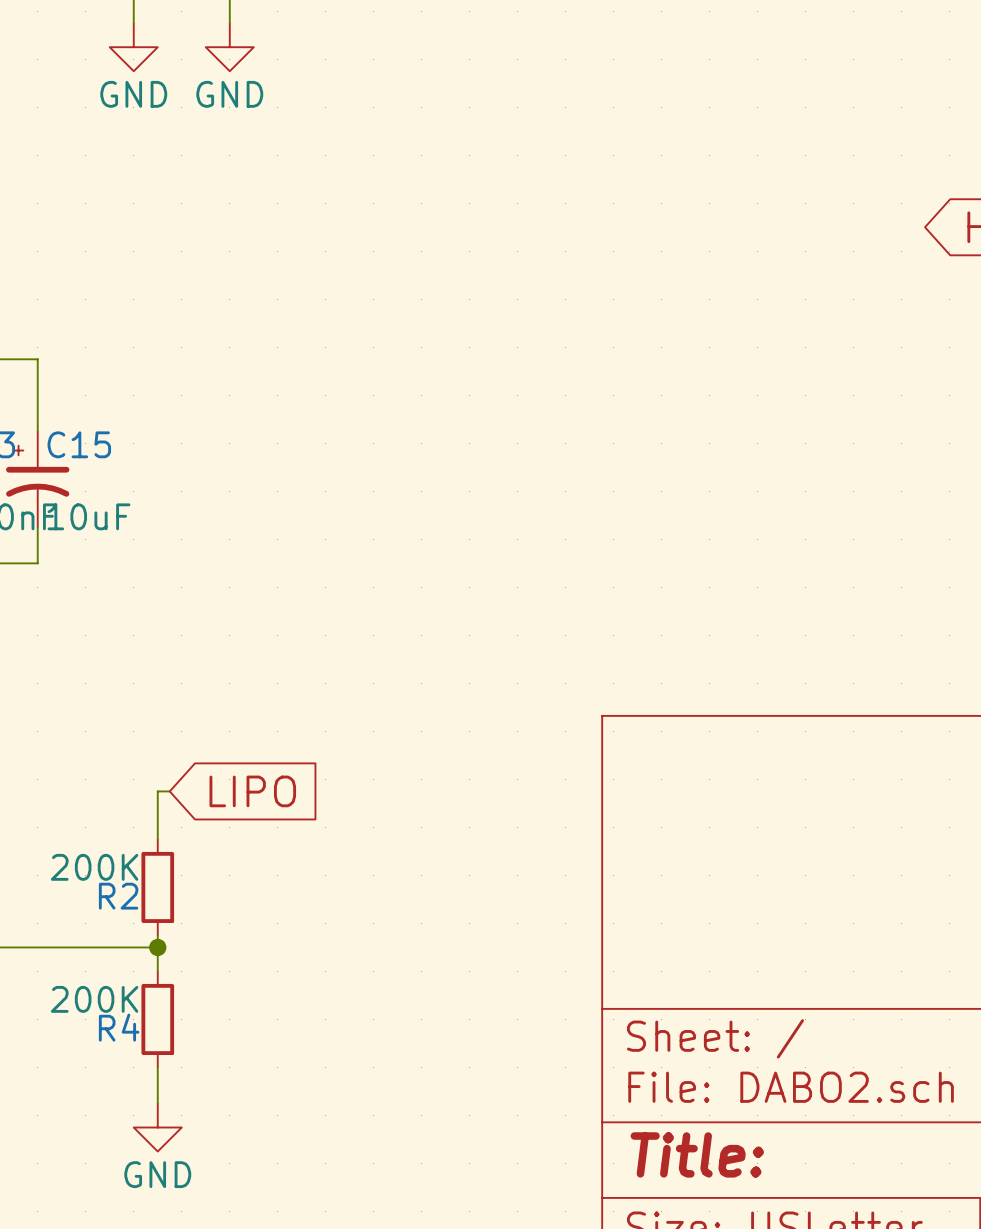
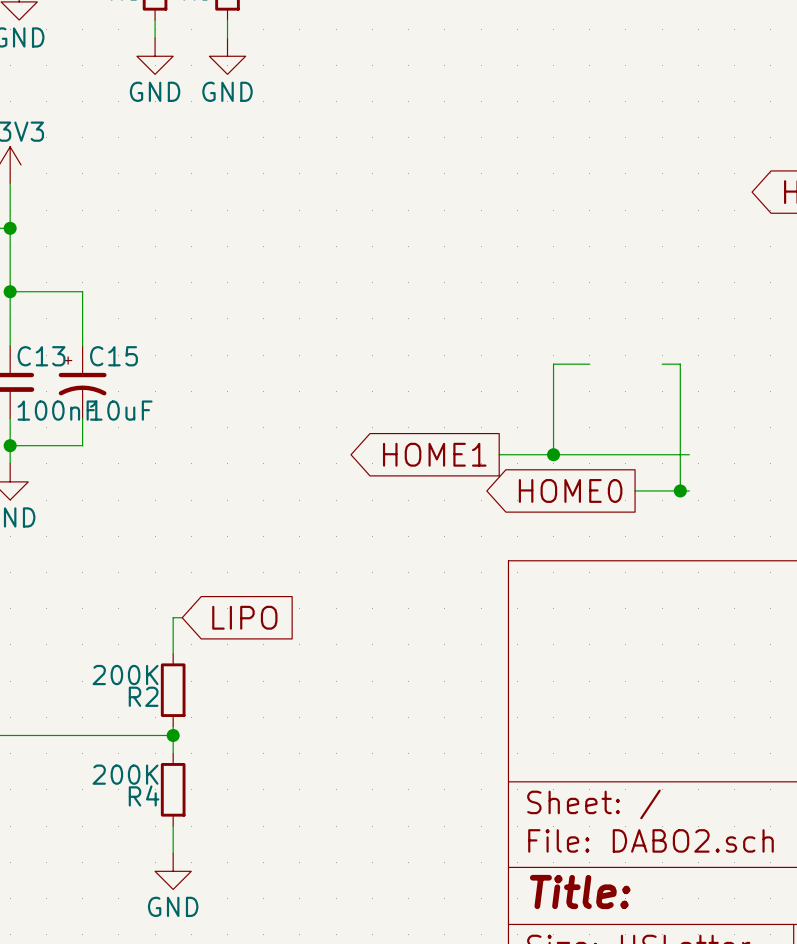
wire: none -> (589, 364) (553, 364) (553, 454)
wire: none -> (662, 364) (680, 364) (680, 490)
global label: none -> HOME1 (434, 454)
wire: none -> (499, 454) (689, 454)
junction: none -> (553, 454)
global label: none -> HOME0 (570, 490)
wire: none -> (635, 490) (689, 490)
junction: none -> (680, 490)

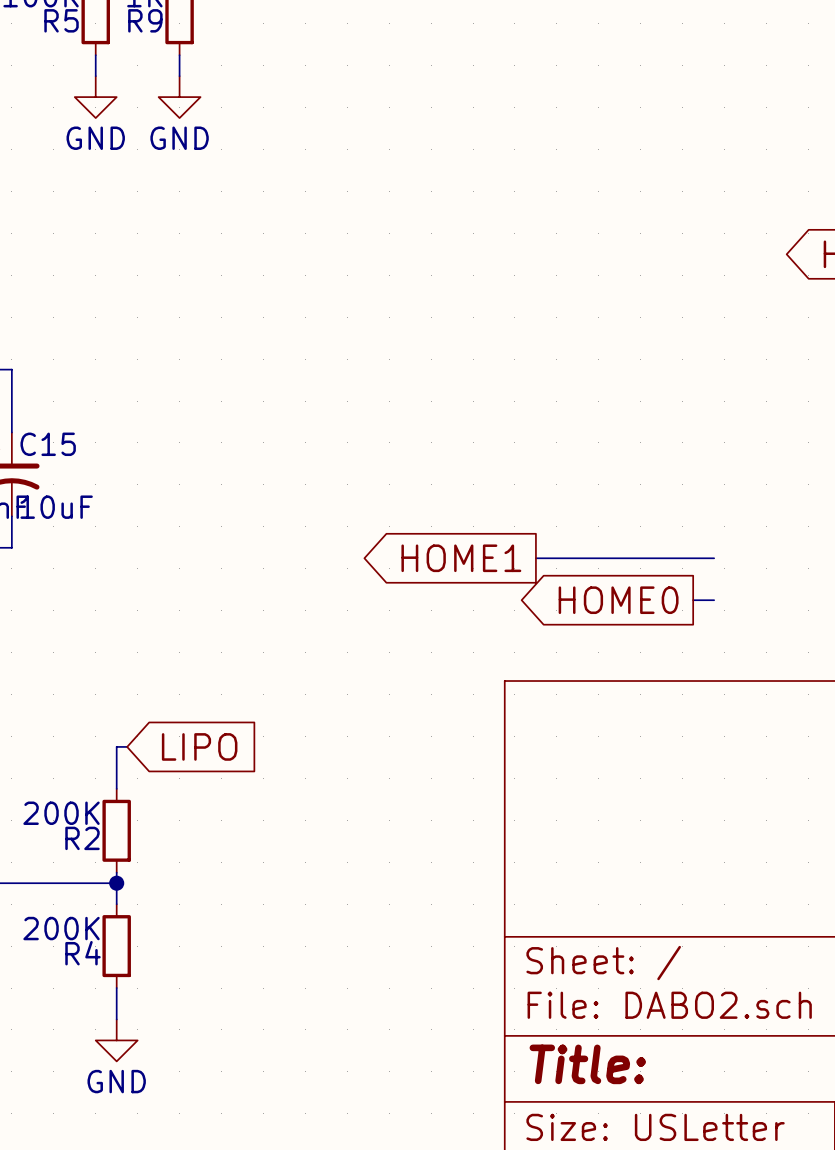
wire: (589, 364) (553, 364) (553, 454) -> none
wire: (662, 364) (680, 364) (680, 490) -> none
global label position: HOME1 (434, 454) -> HOME1 (461, 558)
wire: (499, 454) (535, 454) -> none
junction: (553, 454) -> none
global label position: HOME0 (570, 490) -> HOME0 (618, 600)
wire: (635, 490) (671, 490) -> none
junction: (680, 490) -> none

